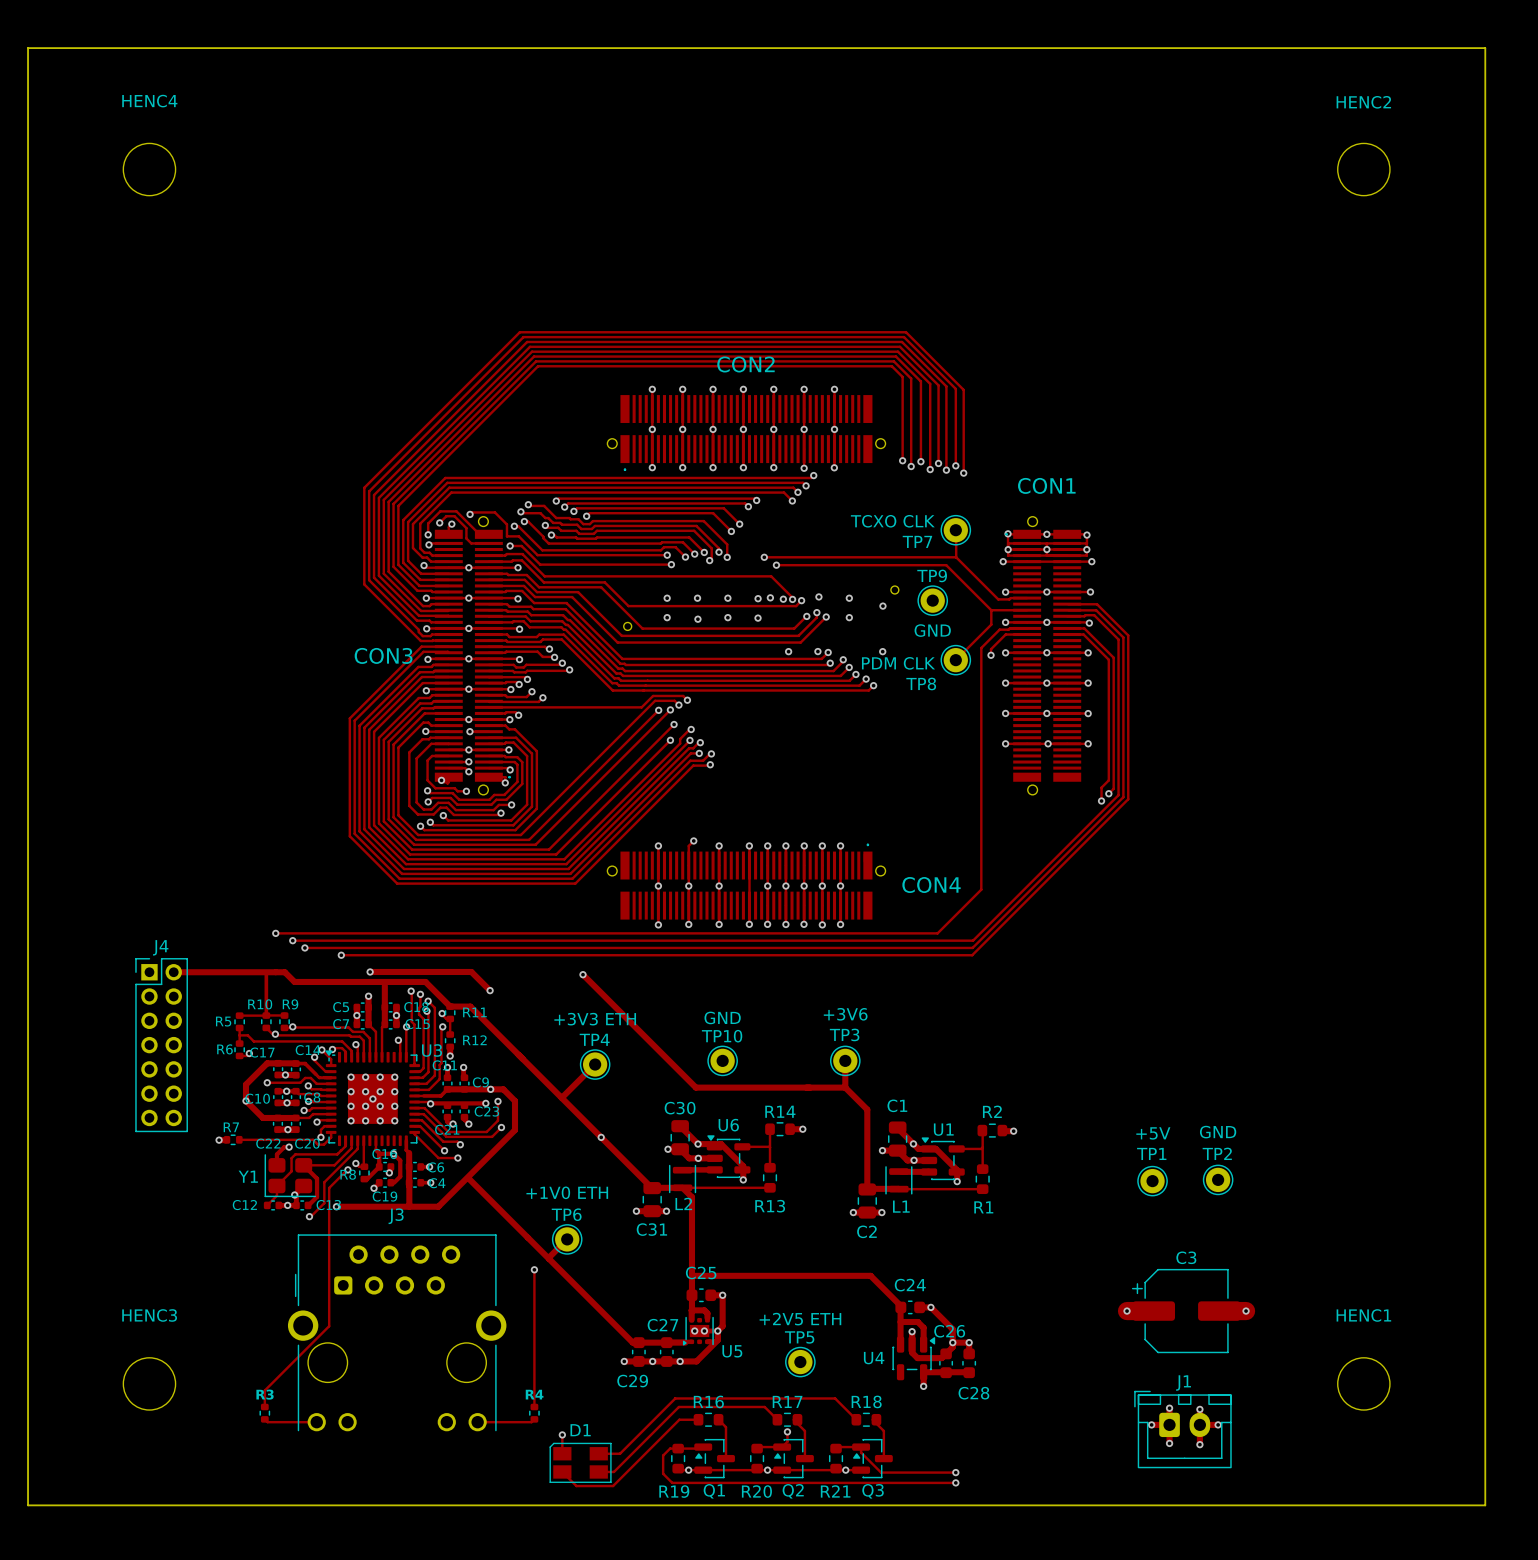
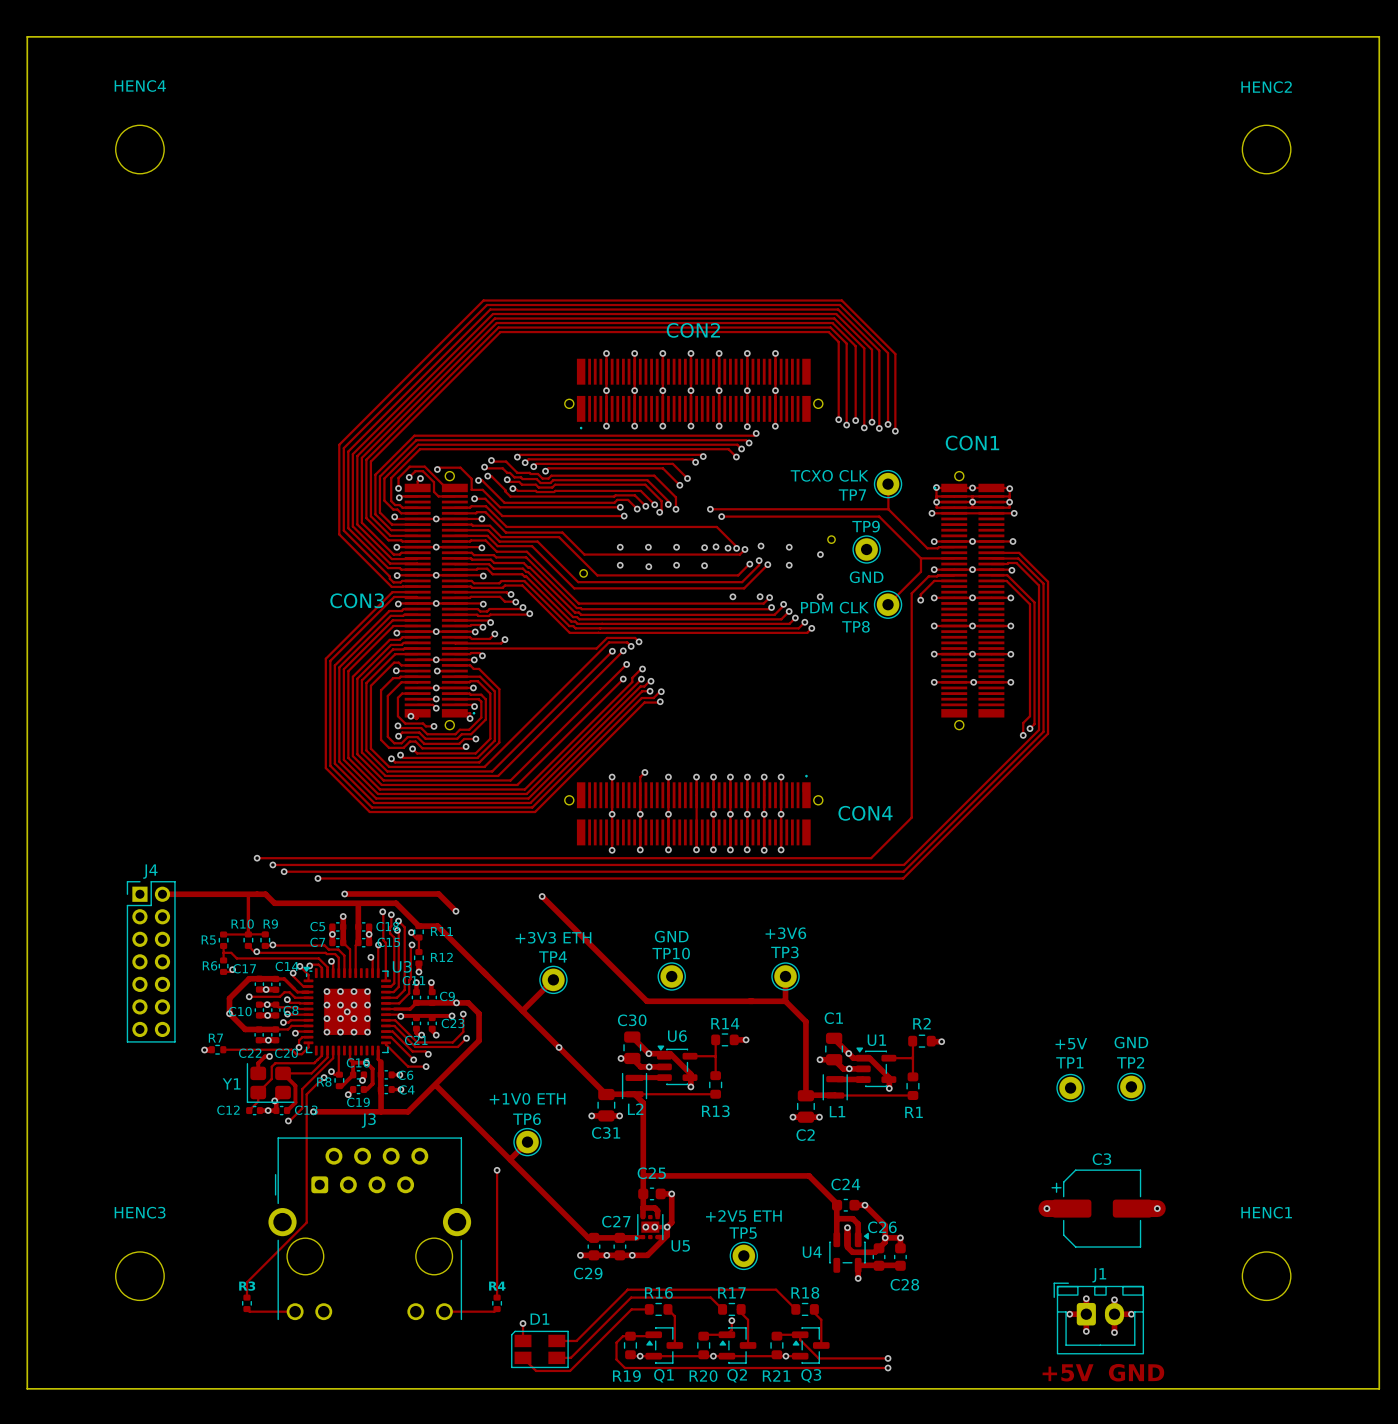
text: none -> GND (1136, 1372)
text: none -> +5V (1068, 1372)

